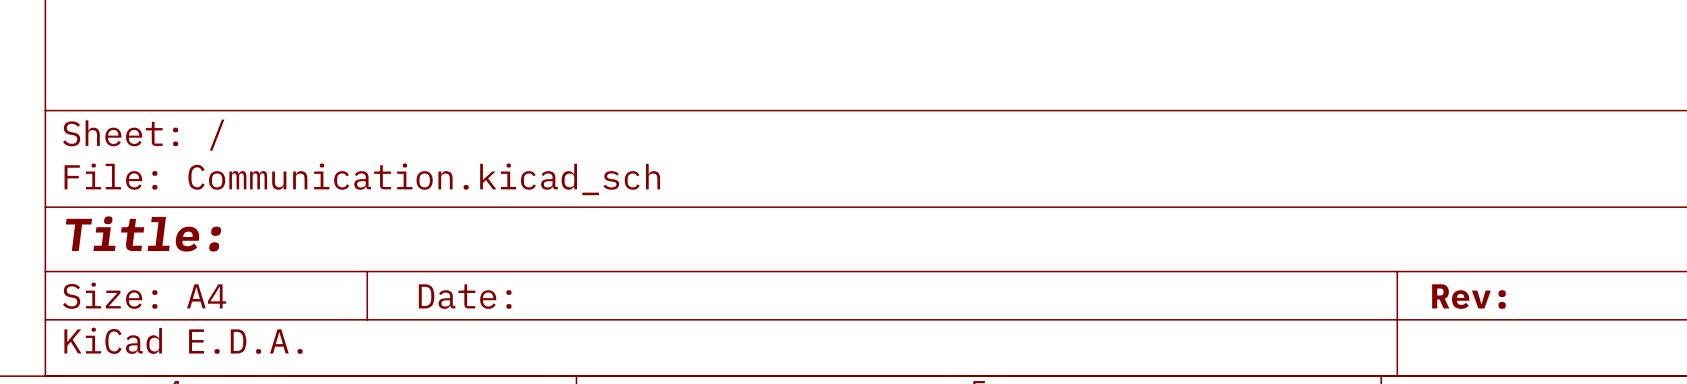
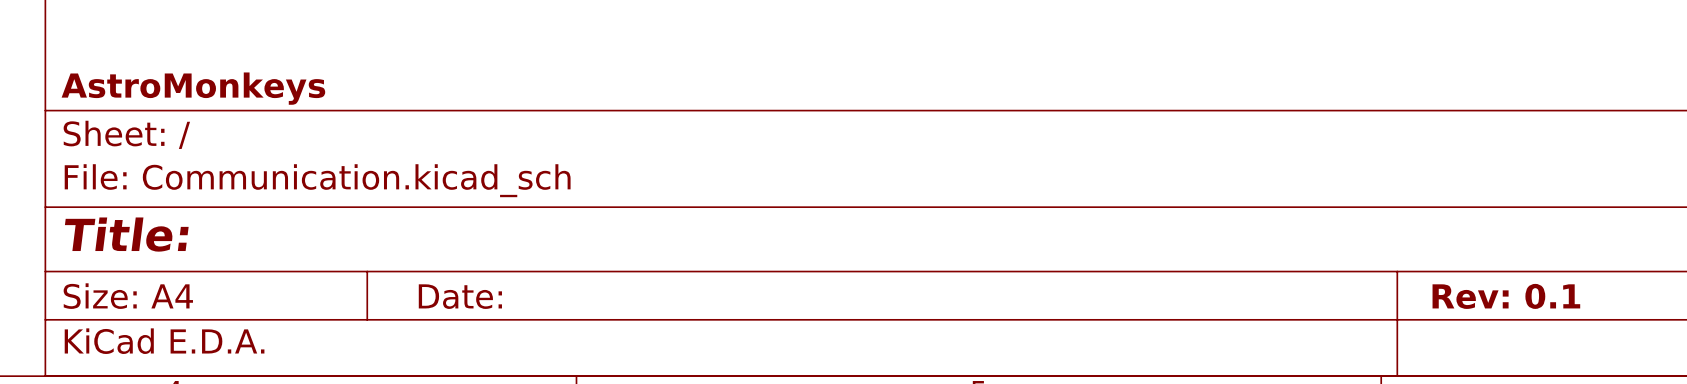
title block: none -> AstroMonkeys (193, 88)
title block: Rev: (1468, 296) -> Rev: 0.1 (1506, 296)

